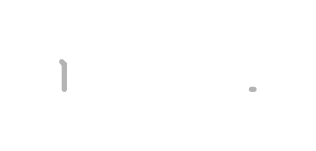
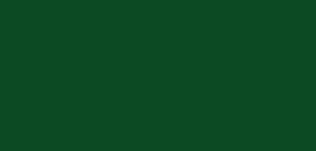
track: (61, 61) (64, 64) (64, 89) -> none
track: (251, 89) (254, 89) -> none

